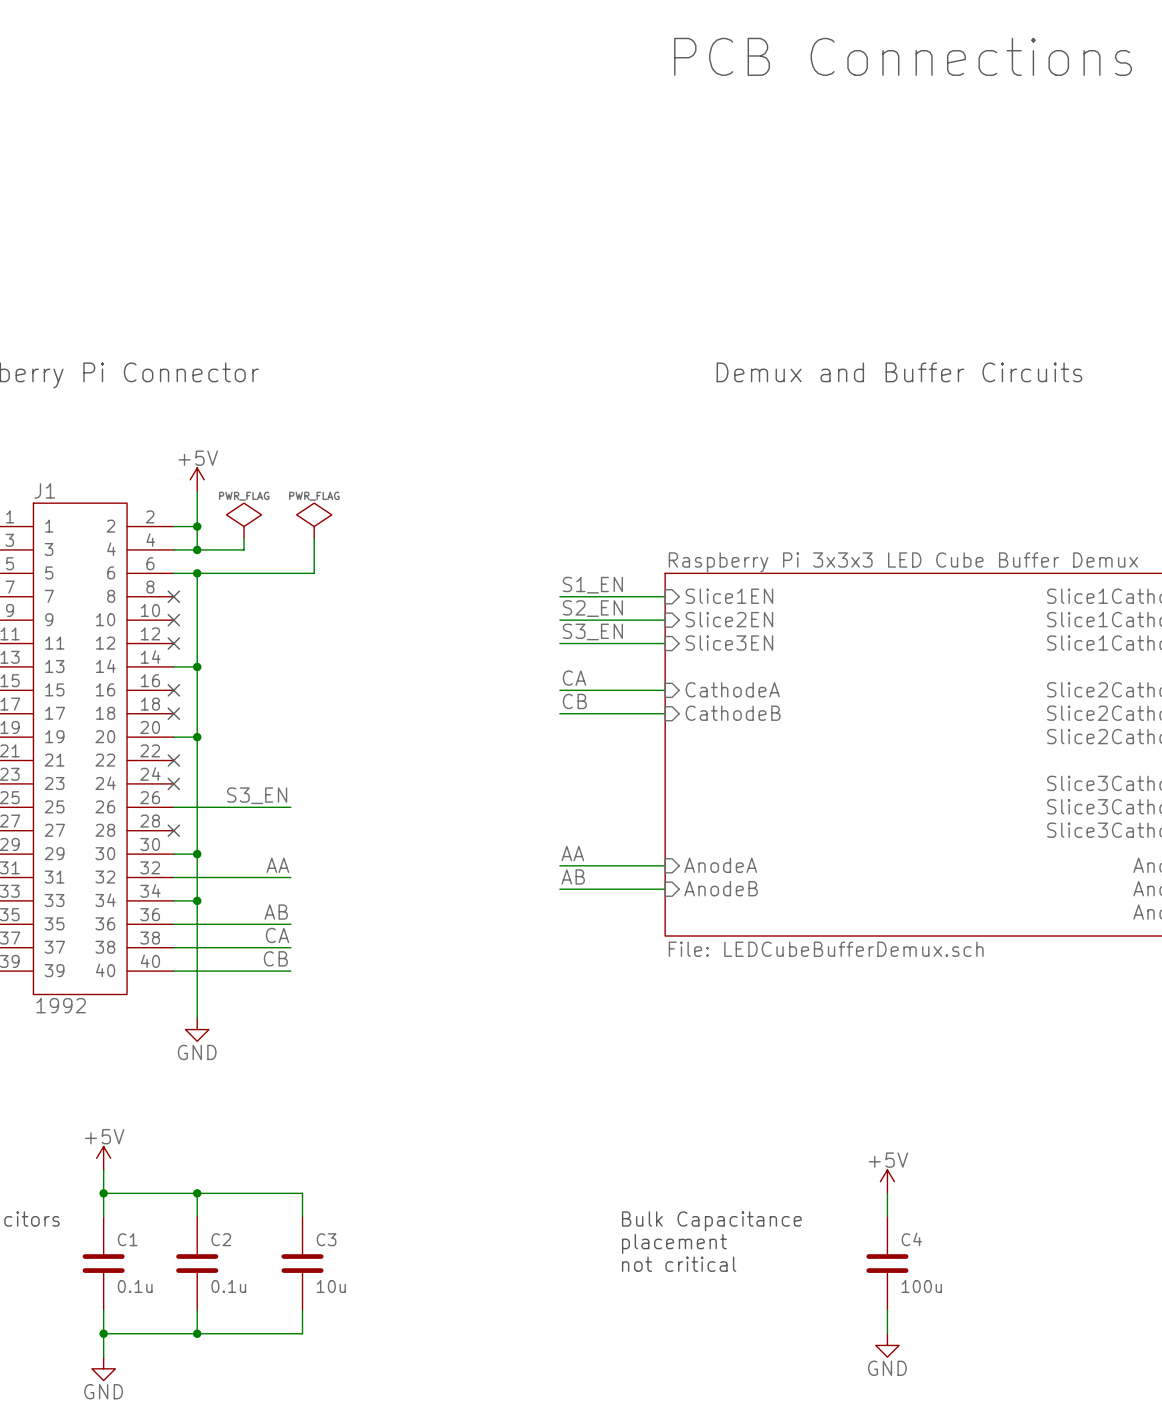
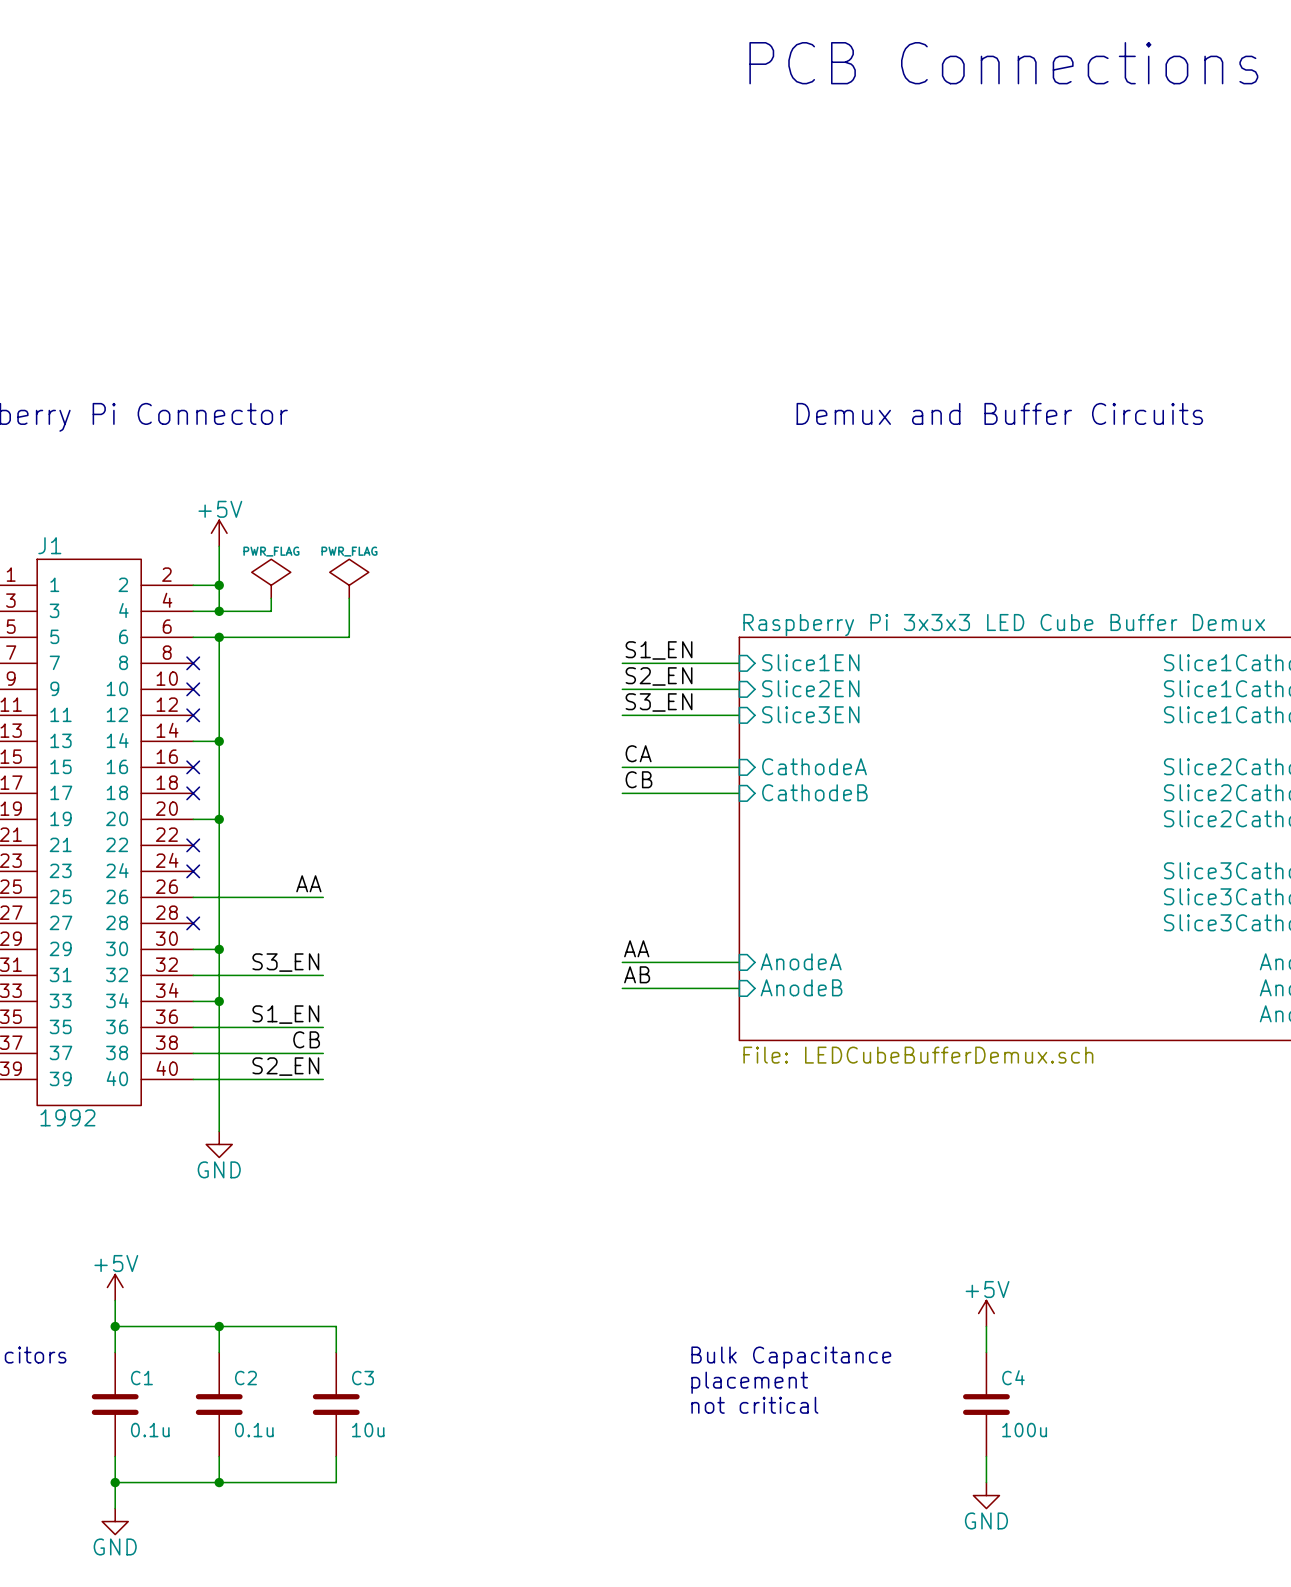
label: S3_EN (257, 795) -> AA (308, 883)
label: AA (277, 865) -> S3_EN (285, 962)
label: AB (276, 912) -> S1_EN (285, 1014)
label: CA (277, 935) -> CB (306, 1039)
label: CB (275, 958) -> S2_EN (285, 1066)

